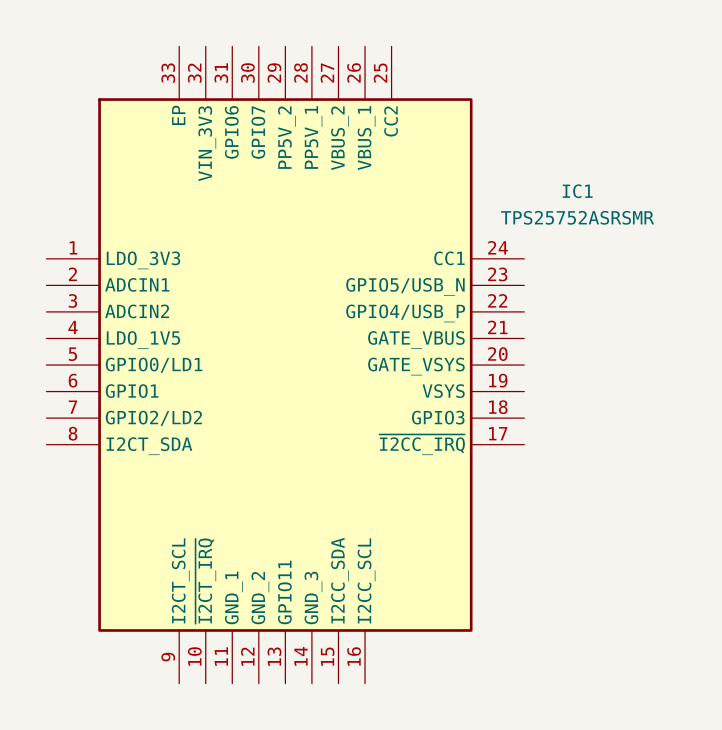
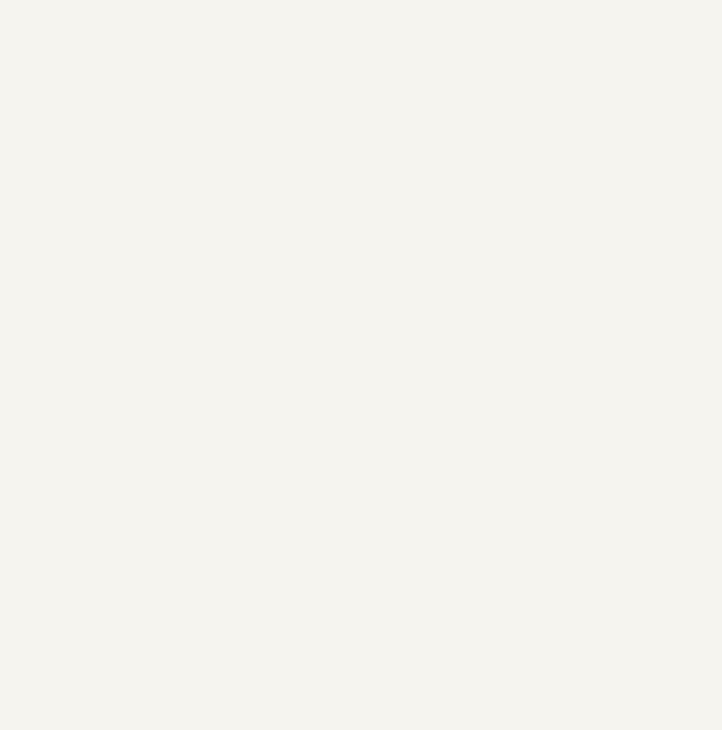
IC1: TPS25752ASRSMR (285, 365) -> none

